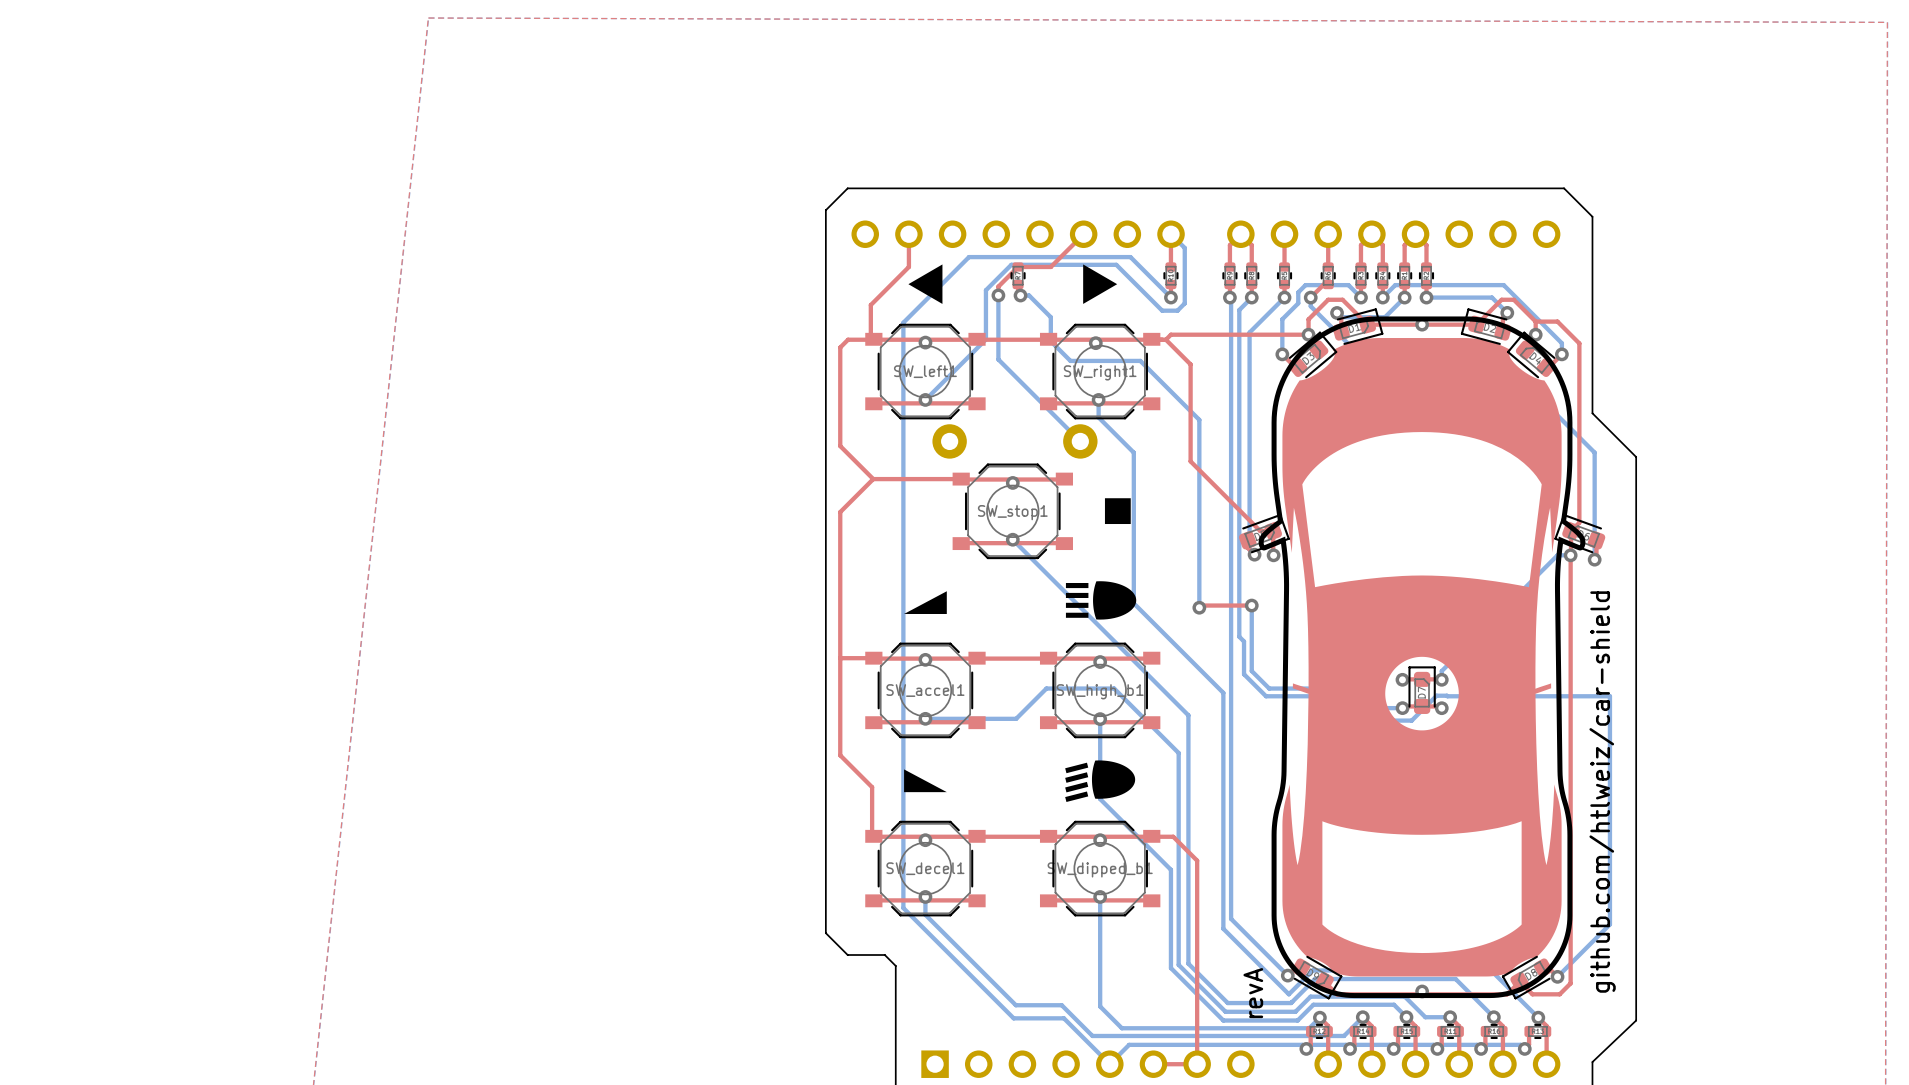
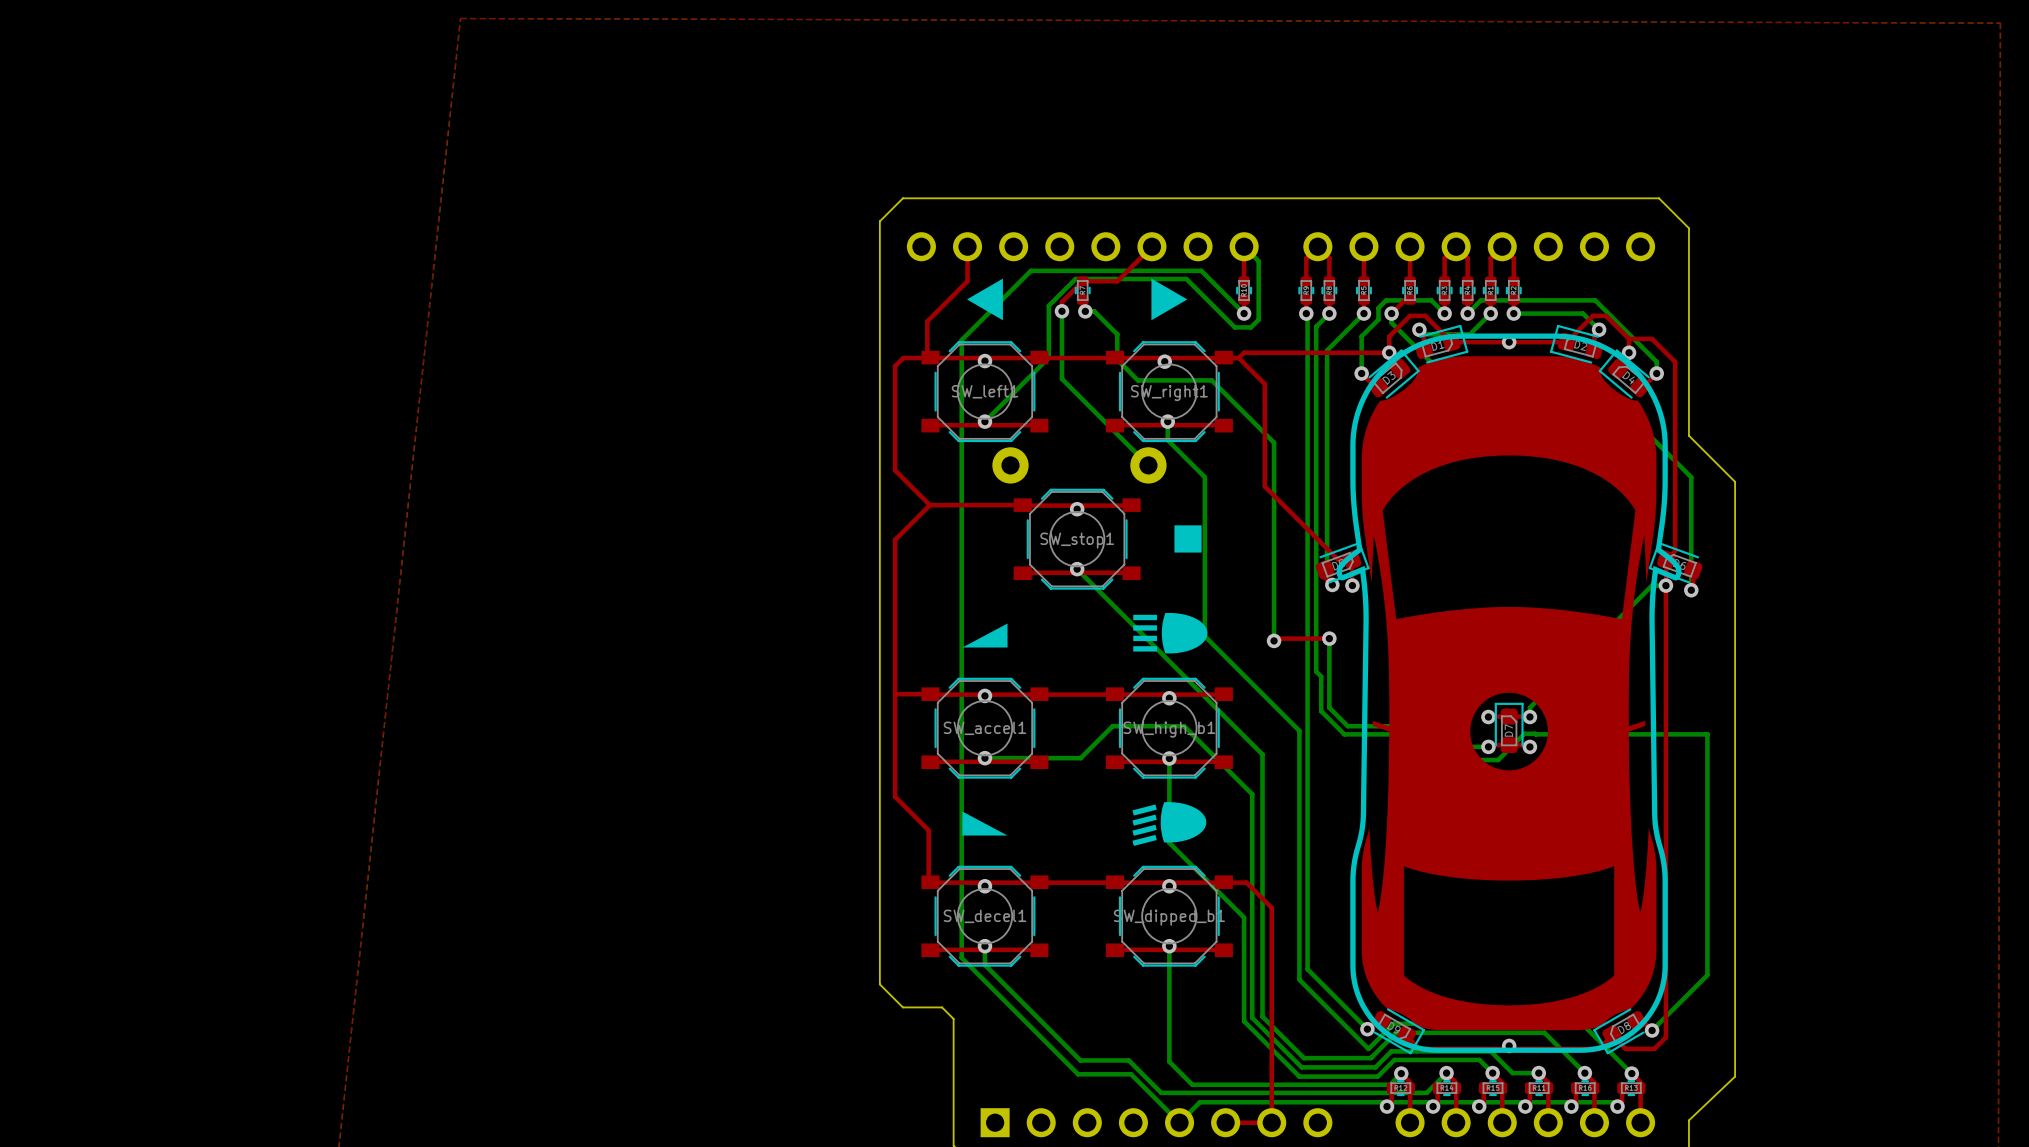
text: github.com/htlweiz/car-shield (1602, 792) -> none
text: revA (1253, 993) -> none

